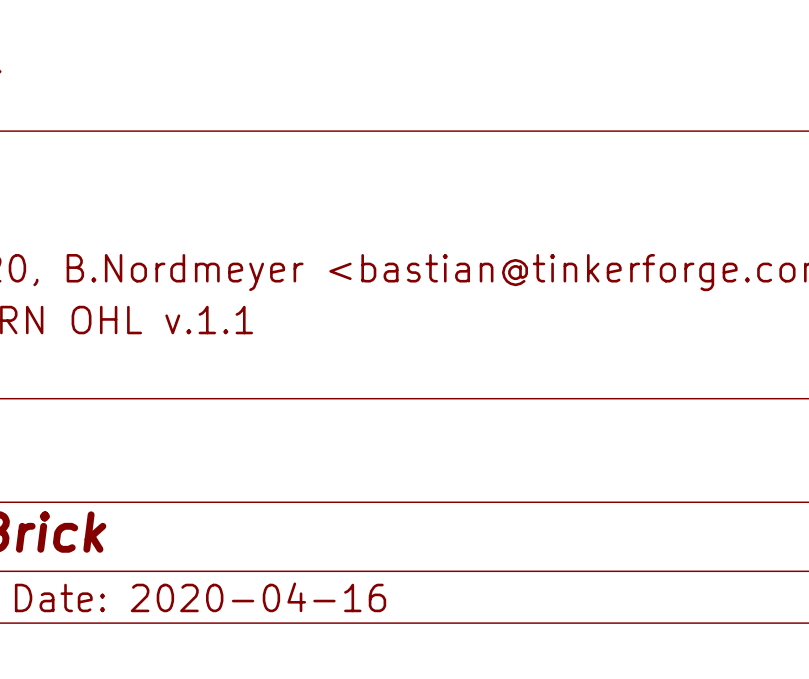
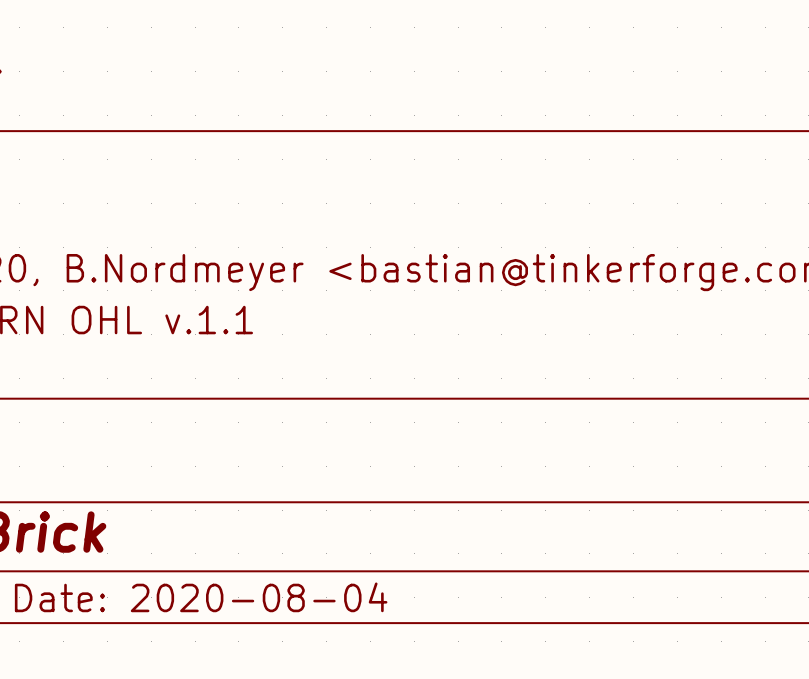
title block: Date: 2020-04-16 (200, 597) -> Date: 2020-08-04 (201, 597)

